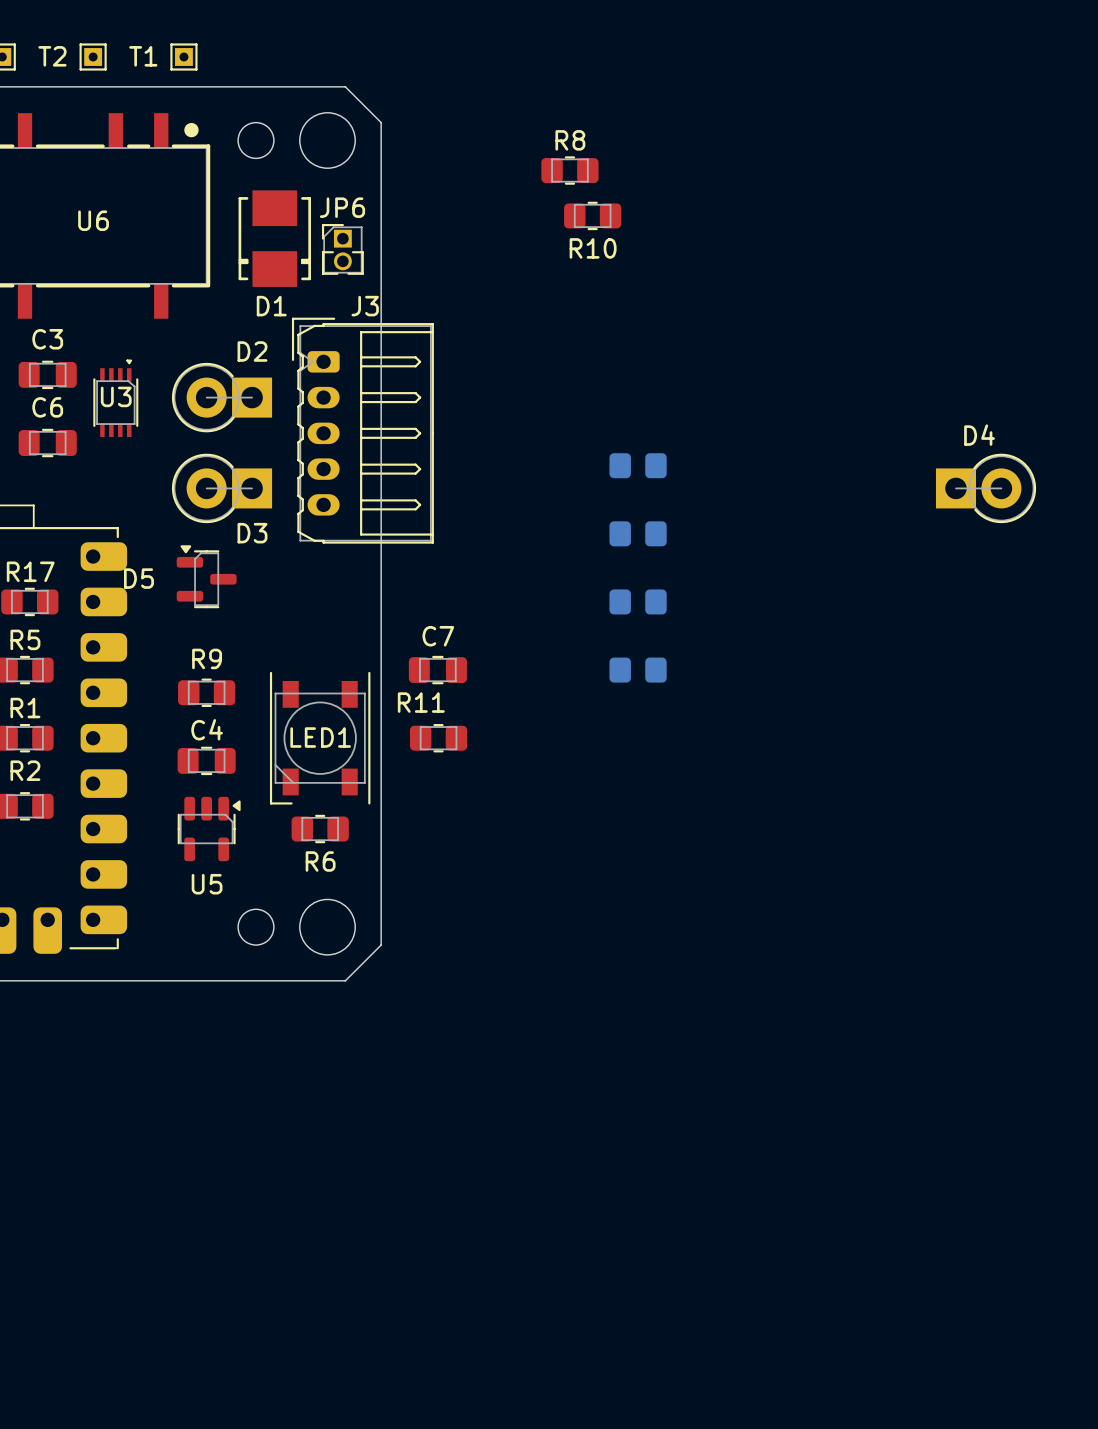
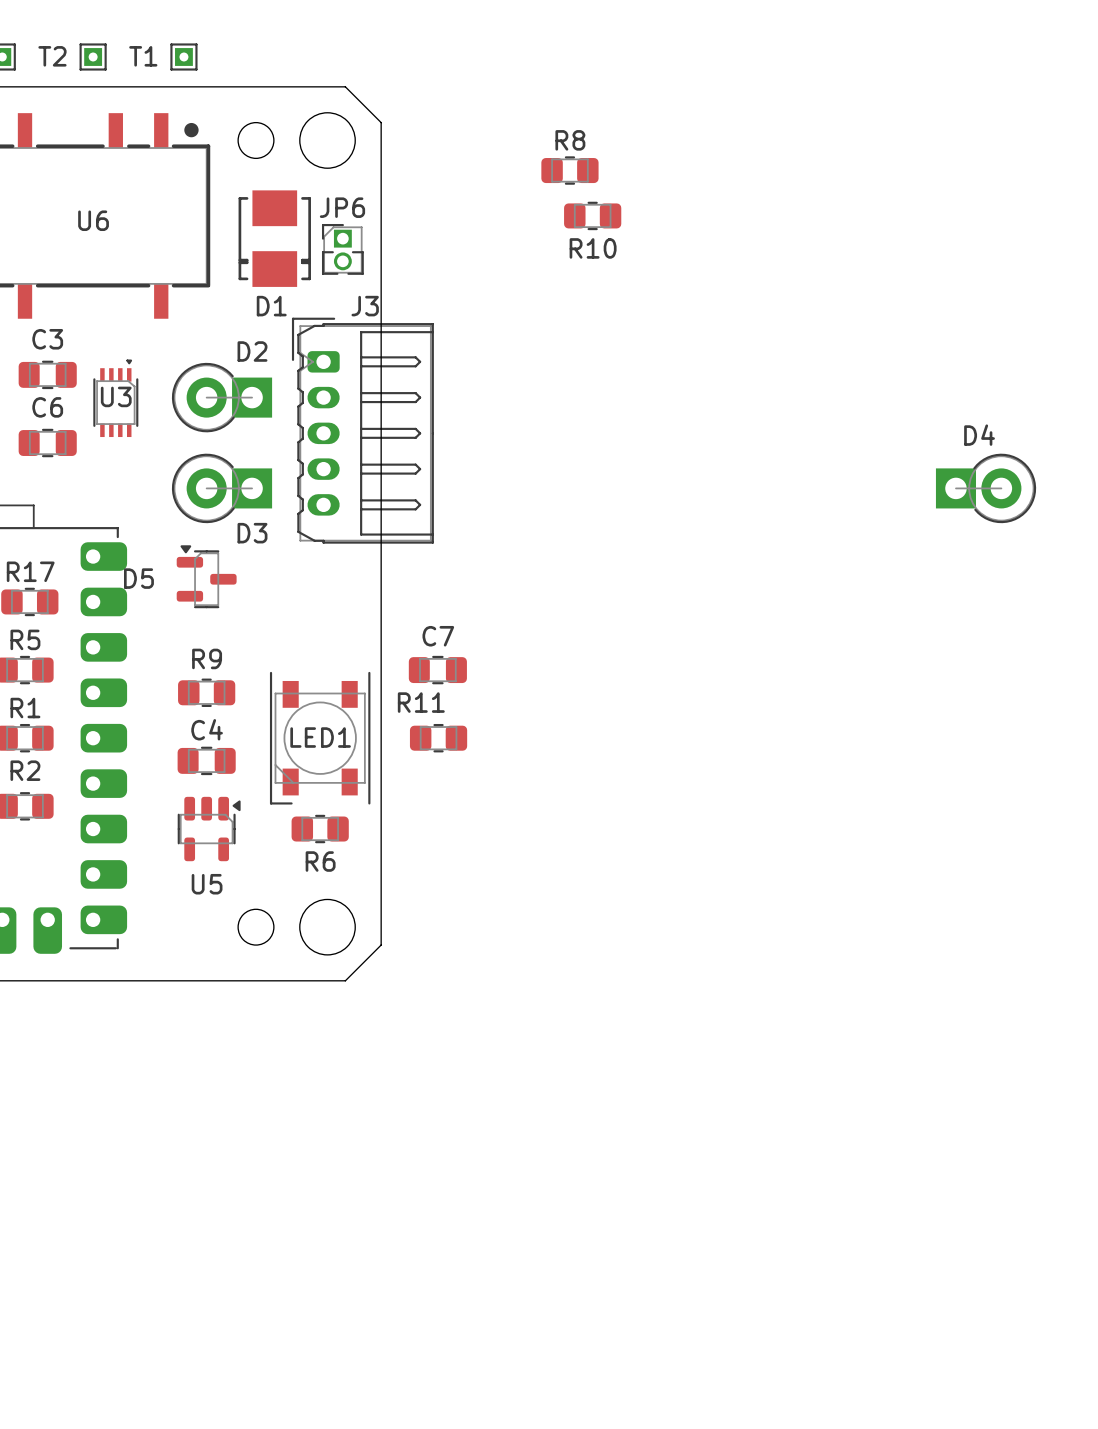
part: (638, 465) -> none
part: (638, 533) -> none
part: (638, 601) -> none
part: (638, 670) -> none

